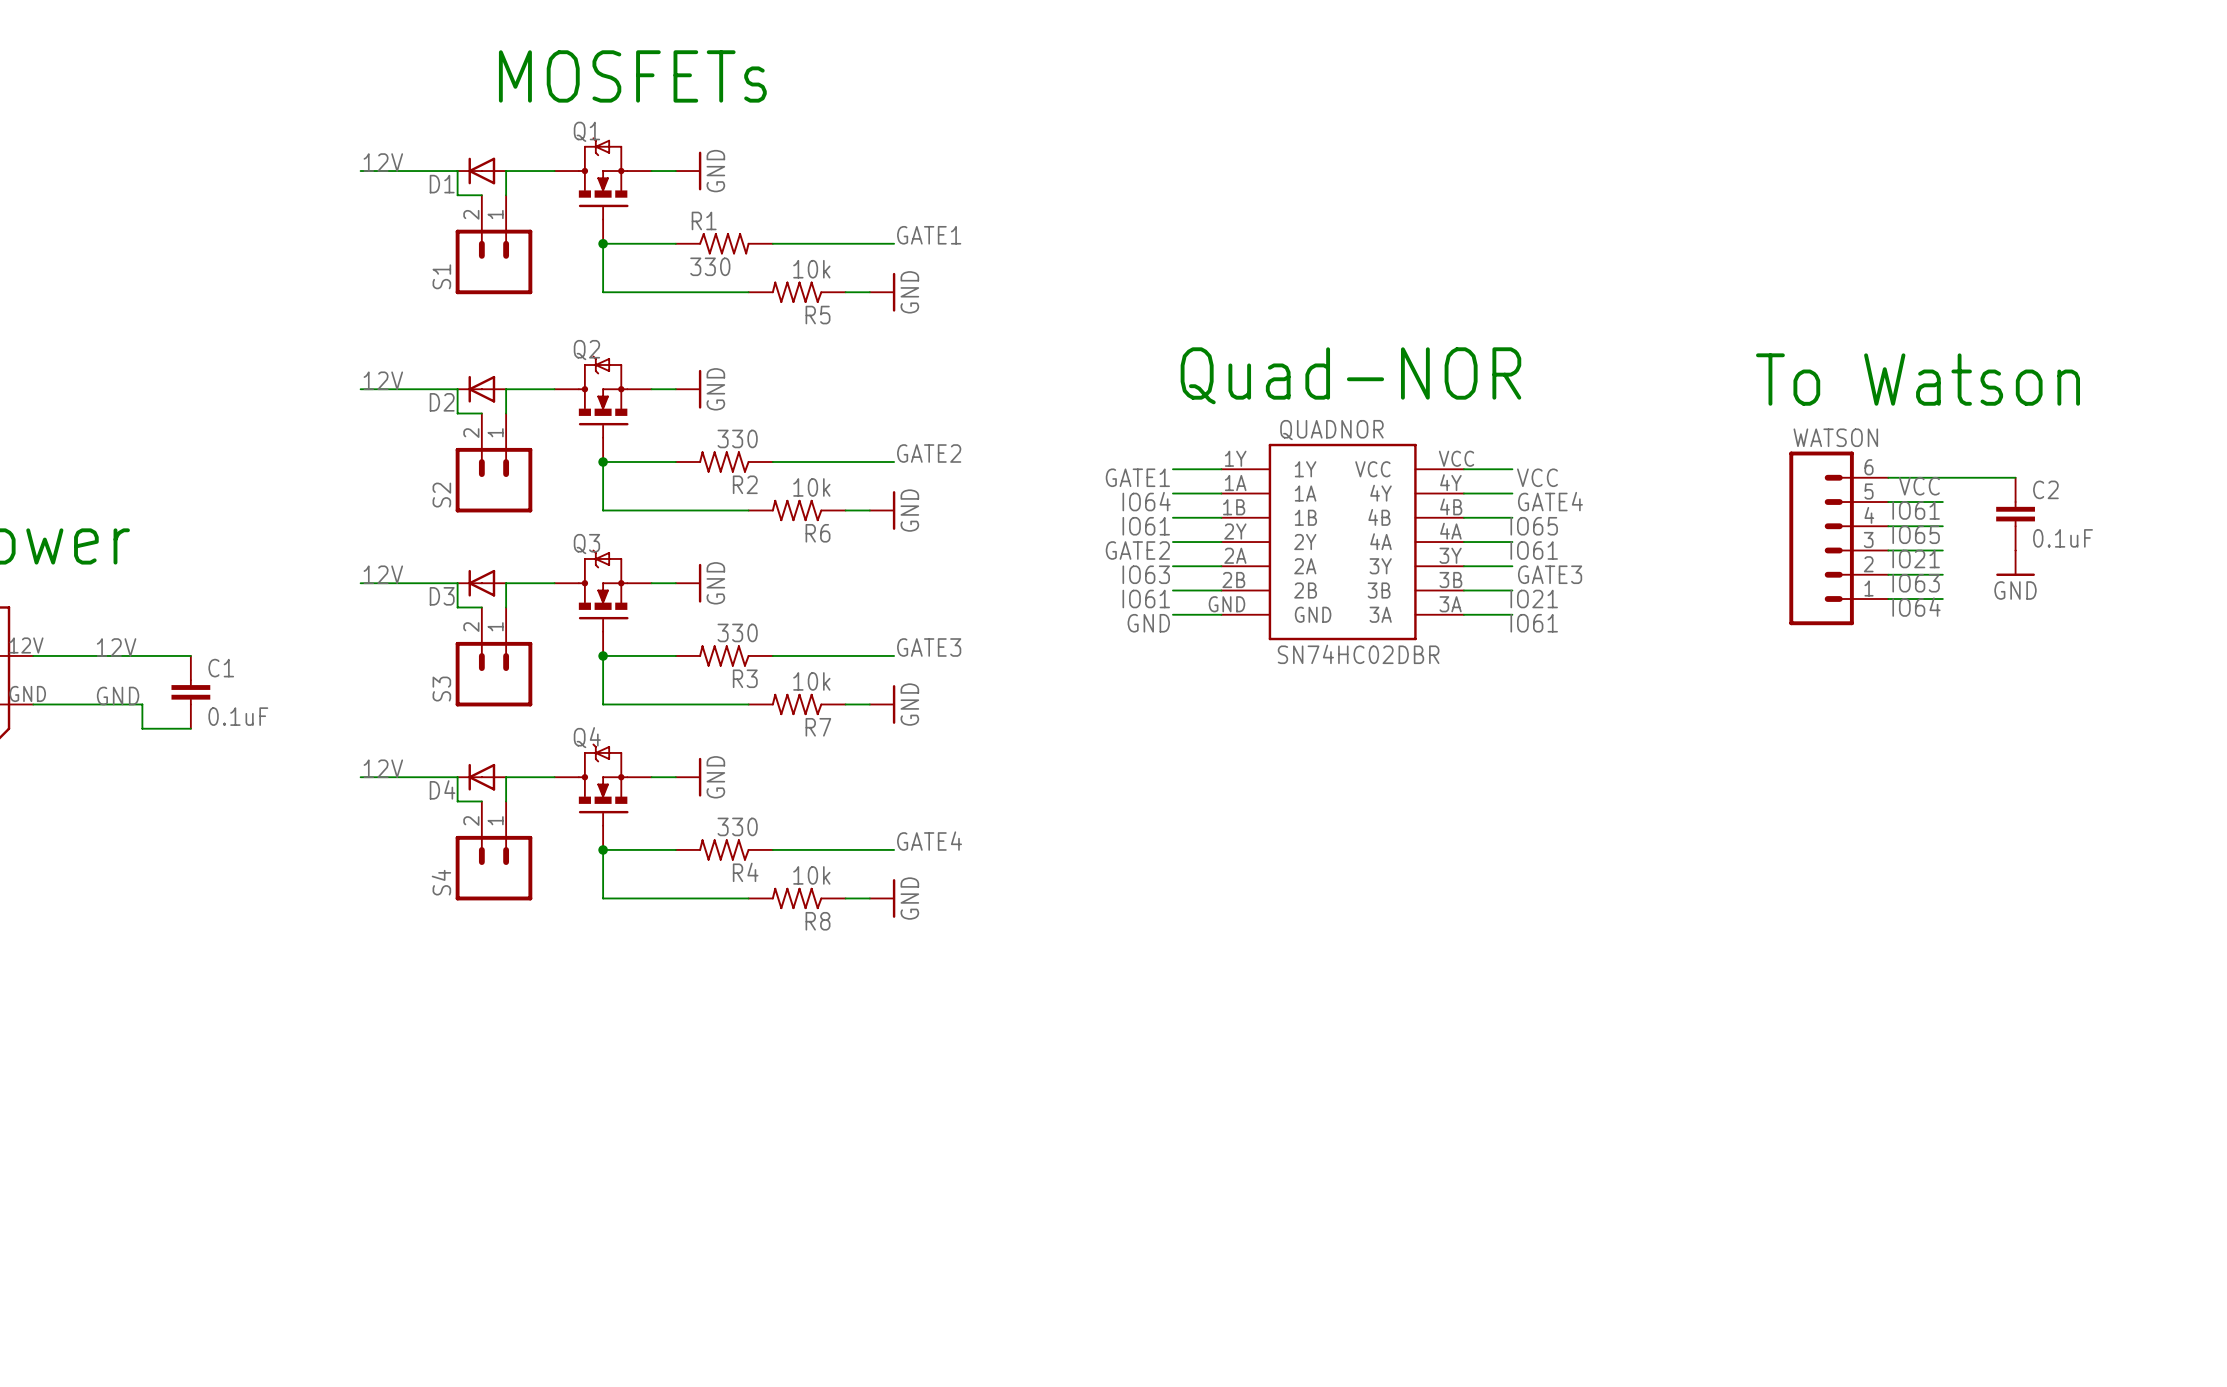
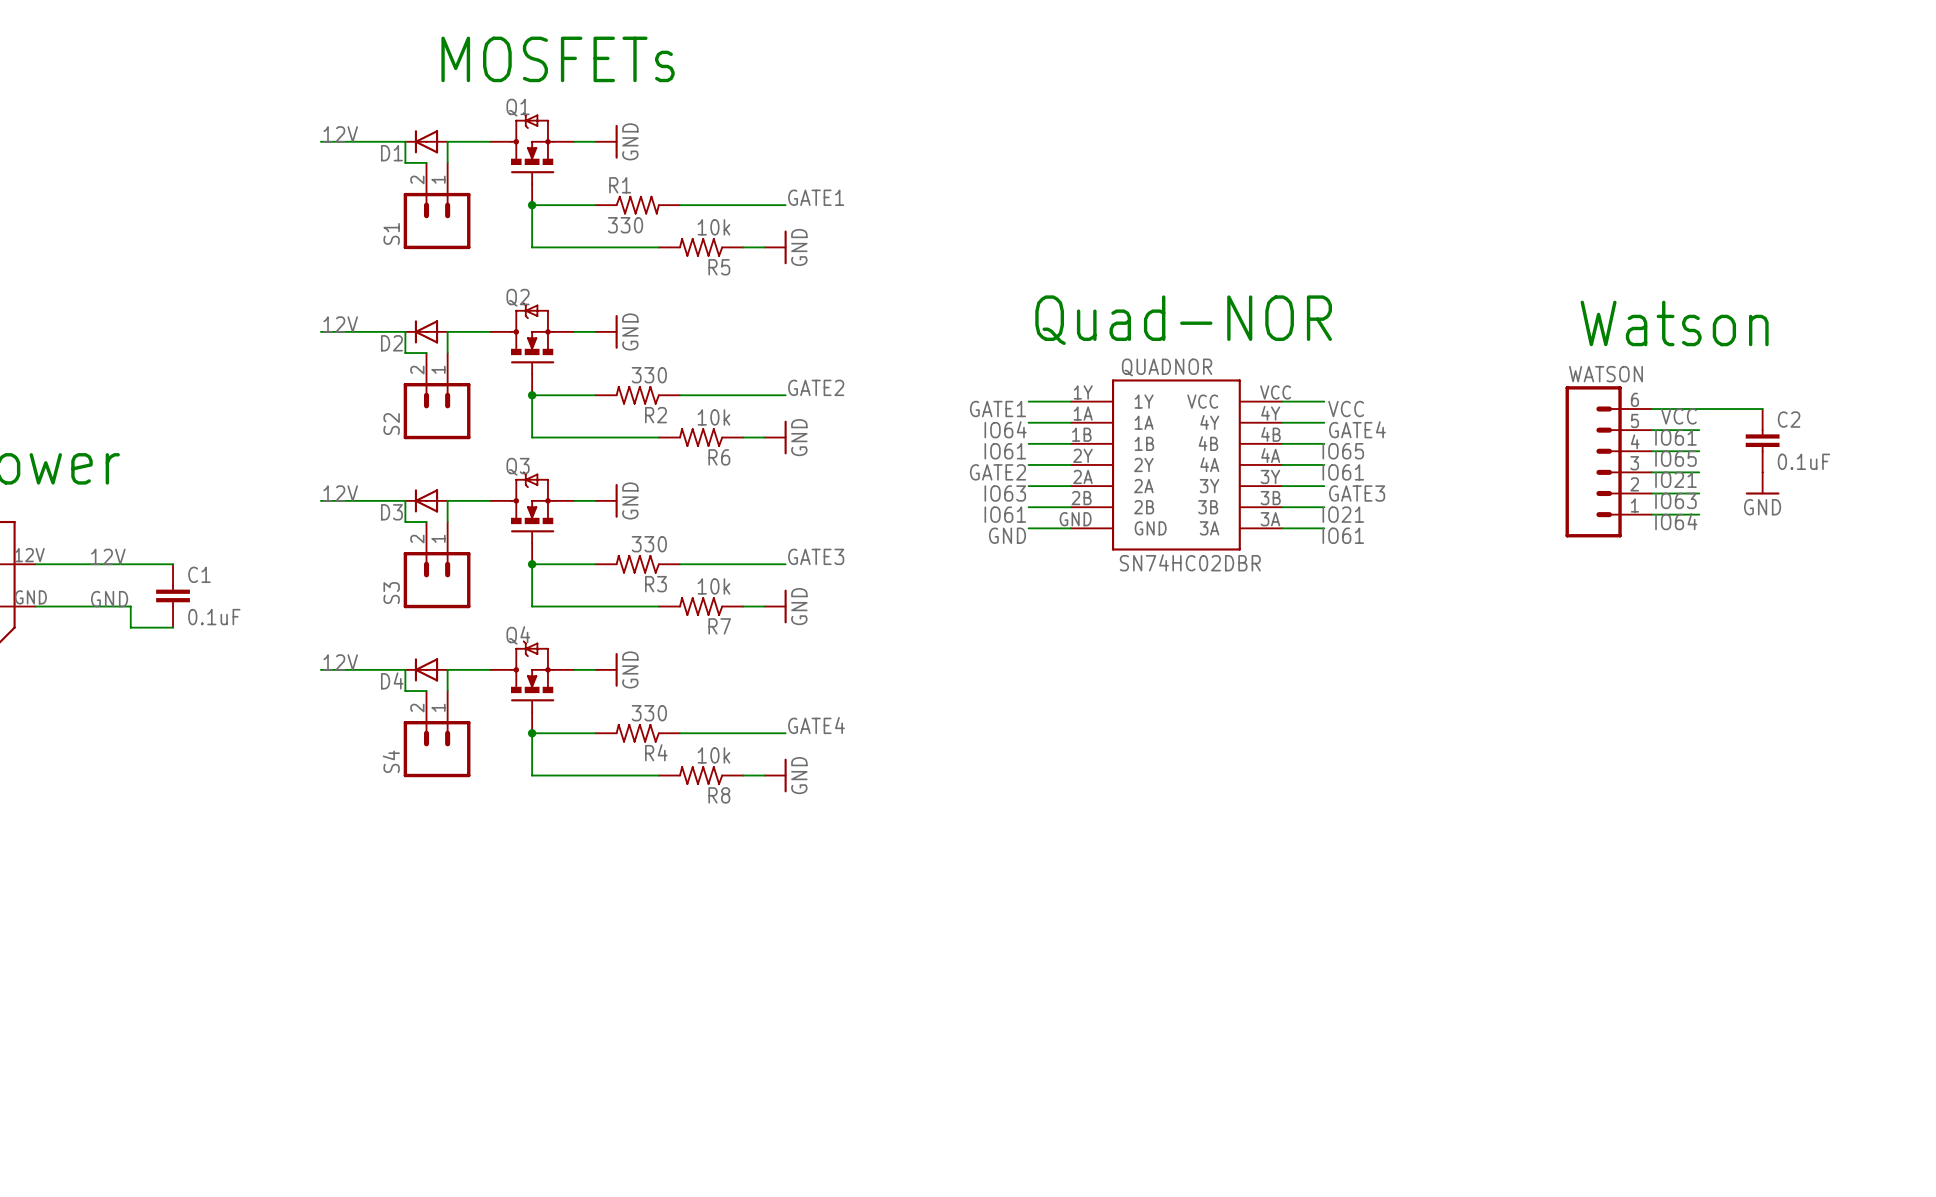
text: To Watson (1918, 379) -> Watson (1674, 323)

